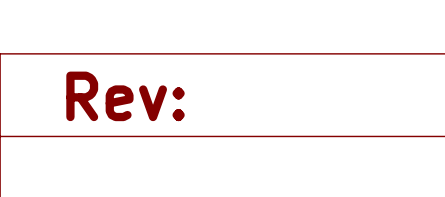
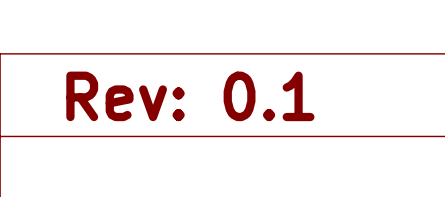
title block: Rev: (125, 96) -> Rev: 0.1 (190, 96)

